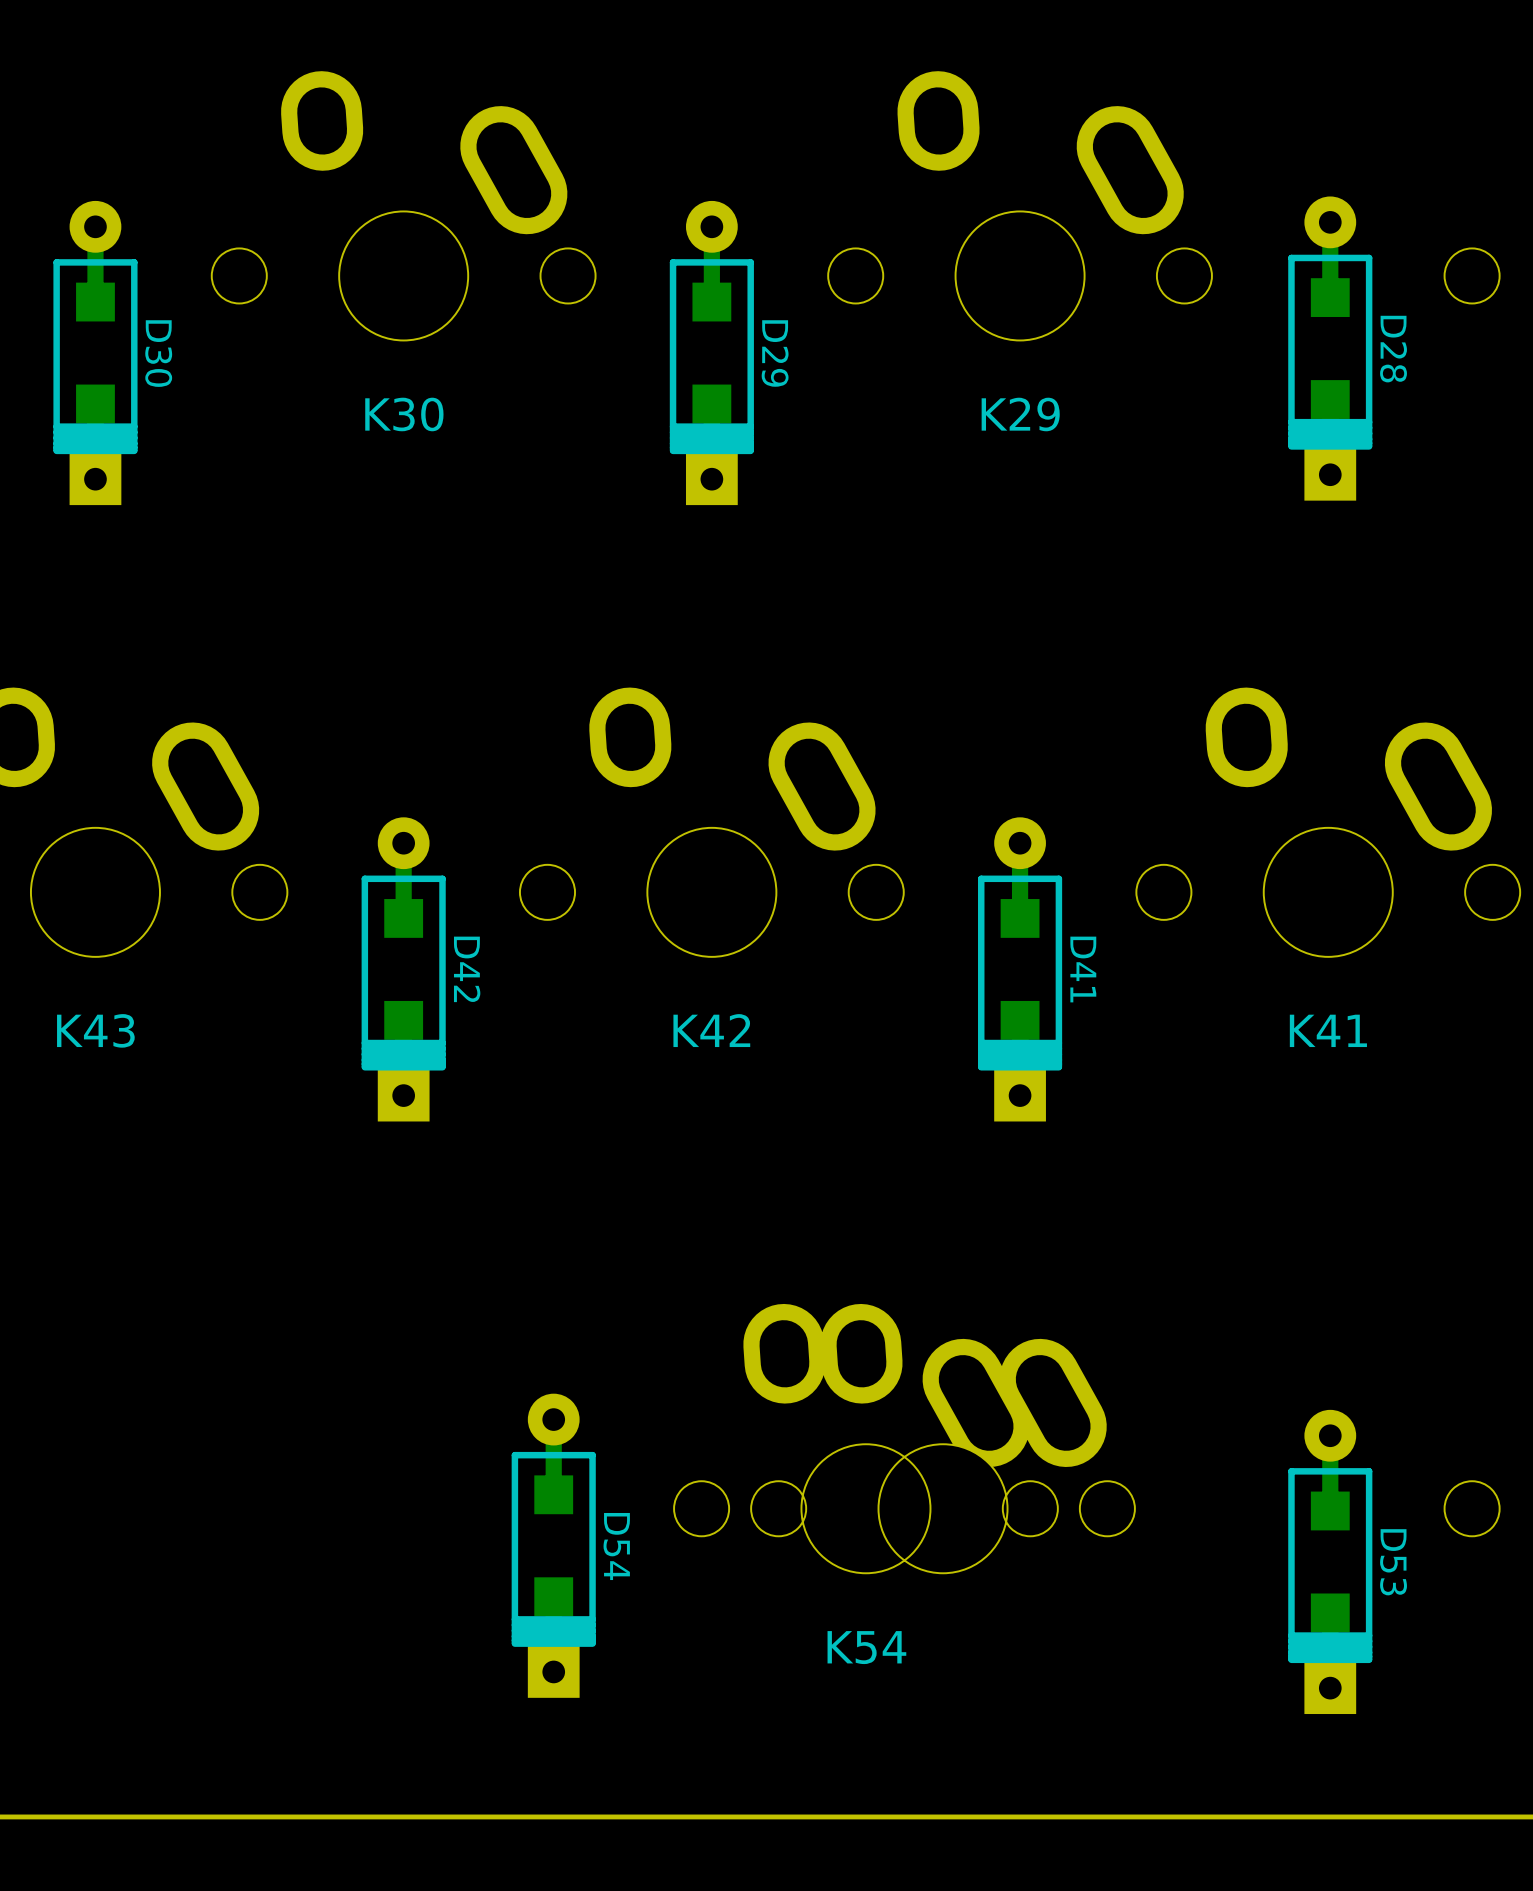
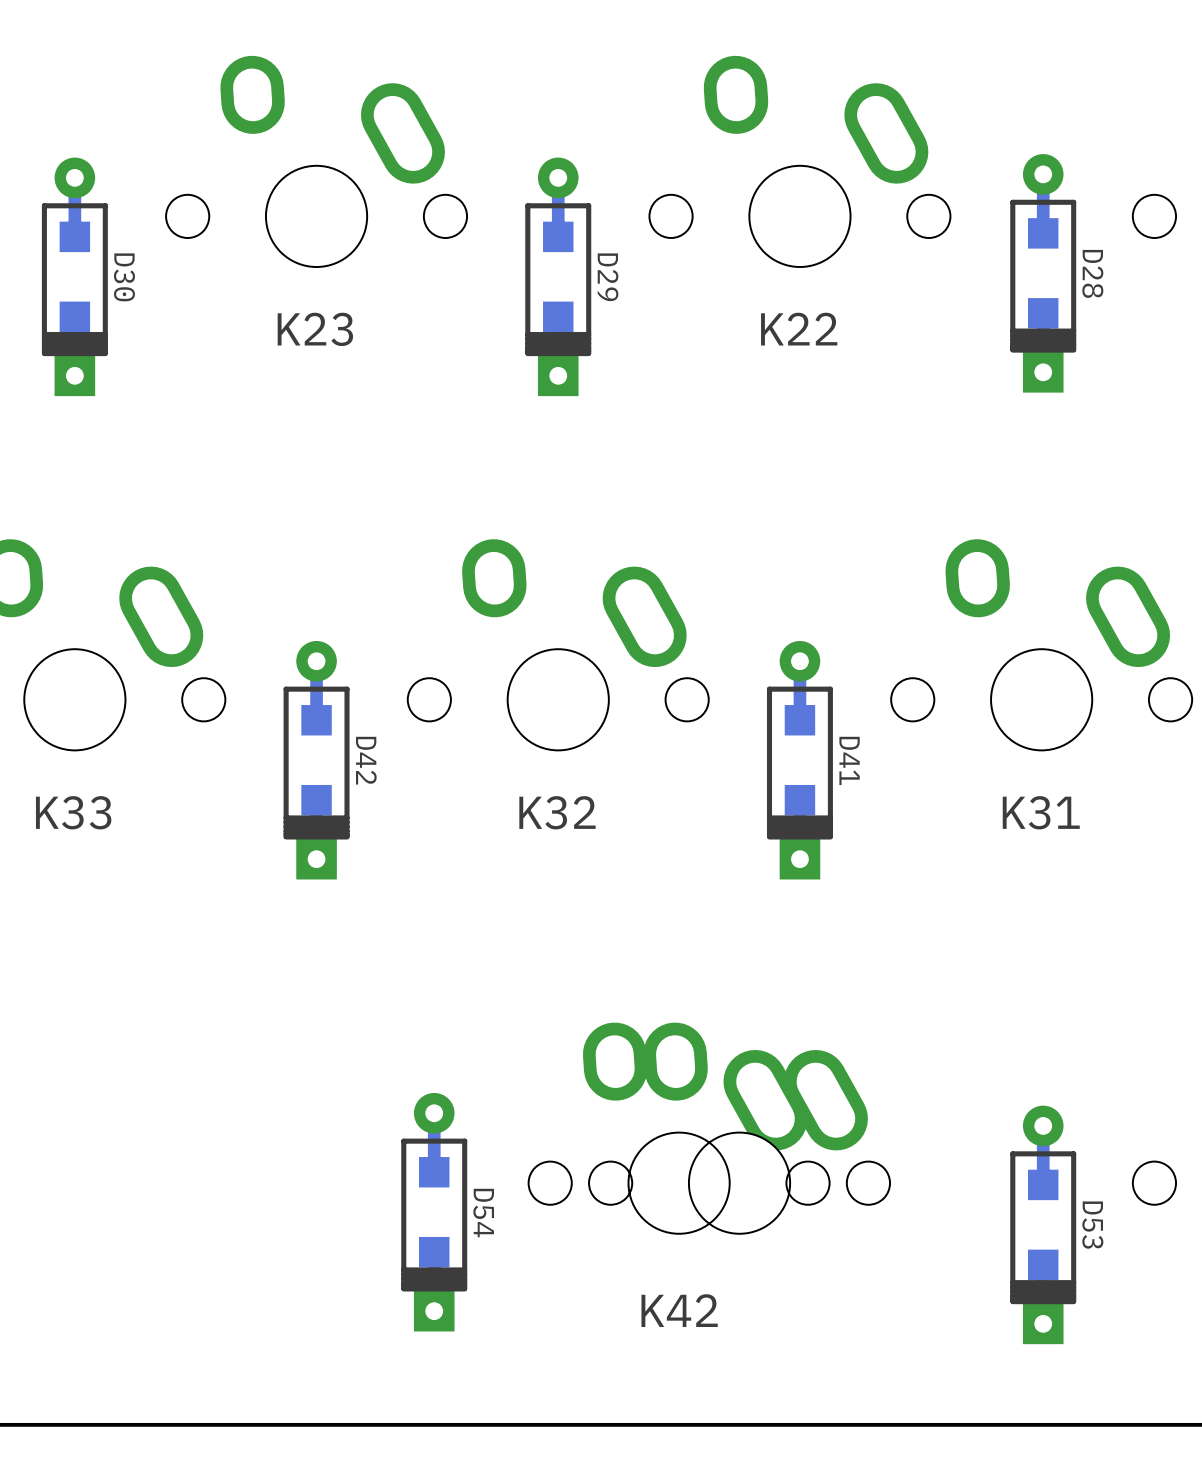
K30 name: K30 (404, 414) -> none
K29 name: K29 (1020, 414) -> none
K29 value: none -> K22 (799, 329)
K30 value: none -> K23 (315, 329)
K43 name: K43 (95, 1030) -> none
K42 name: K42 (711, 1030) -> none
K41 name: K41 (1328, 1030) -> none
K43 value: none -> K33 (73, 812)
K42 value: none -> K32 (557, 812)
K41 value: none -> K31 (1041, 812)
K54 name: K54 (866, 1647) -> none
K54 value: none -> K42 (679, 1310)

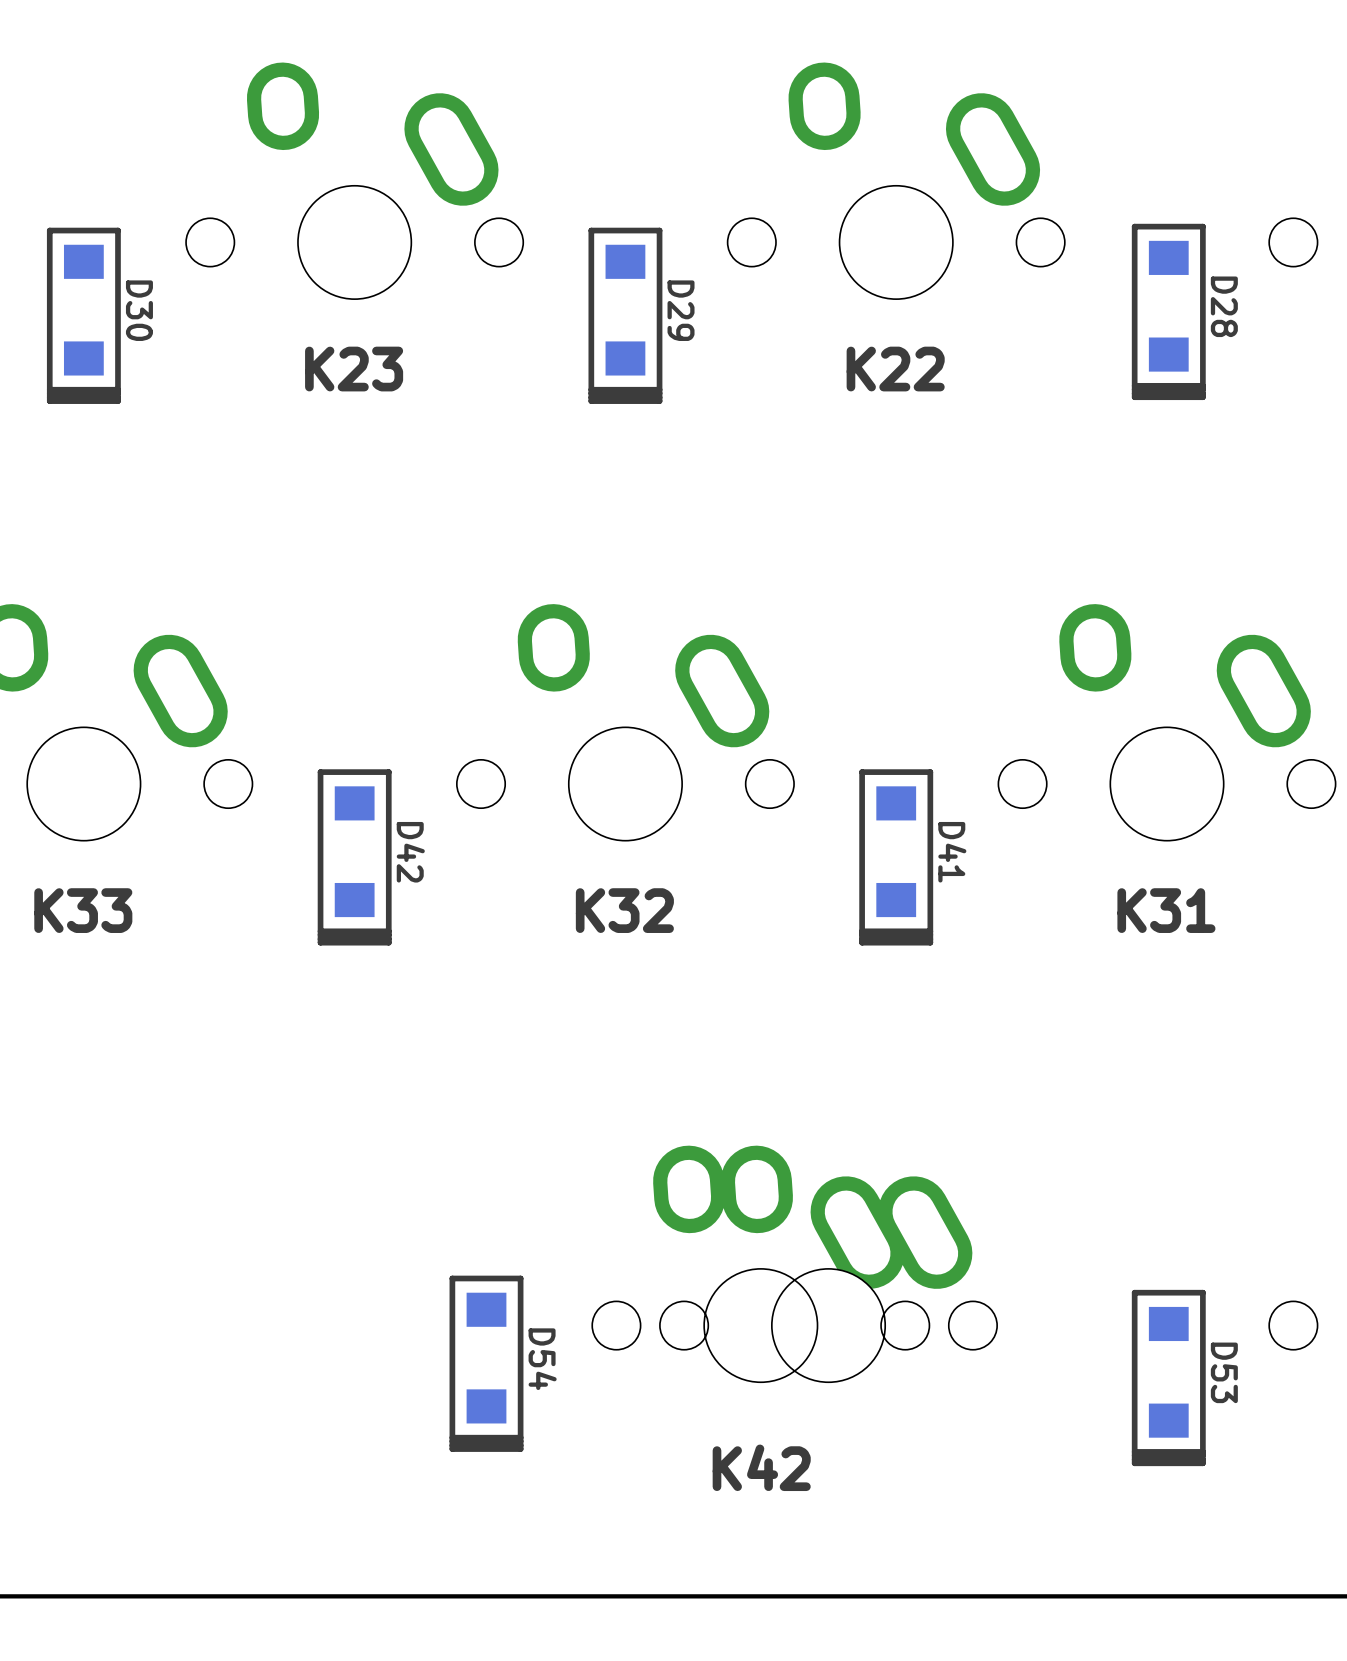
D28 footprint: [1010, 154, 1077, 393] -> [1131, 223, 1206, 401]
D30 footprint: [41, 157, 108, 397] -> [46, 227, 121, 404]
D29 footprint: [525, 157, 592, 397] -> [588, 227, 663, 404]
D42 footprint: [283, 640, 350, 880] -> [317, 769, 392, 946]
D41 footprint: [766, 640, 833, 880] -> [859, 769, 934, 946]
D54 footprint: [401, 1092, 468, 1332] -> [449, 1275, 524, 1452]
D53 footprint: [1010, 1105, 1077, 1345] -> [1131, 1289, 1206, 1467]

